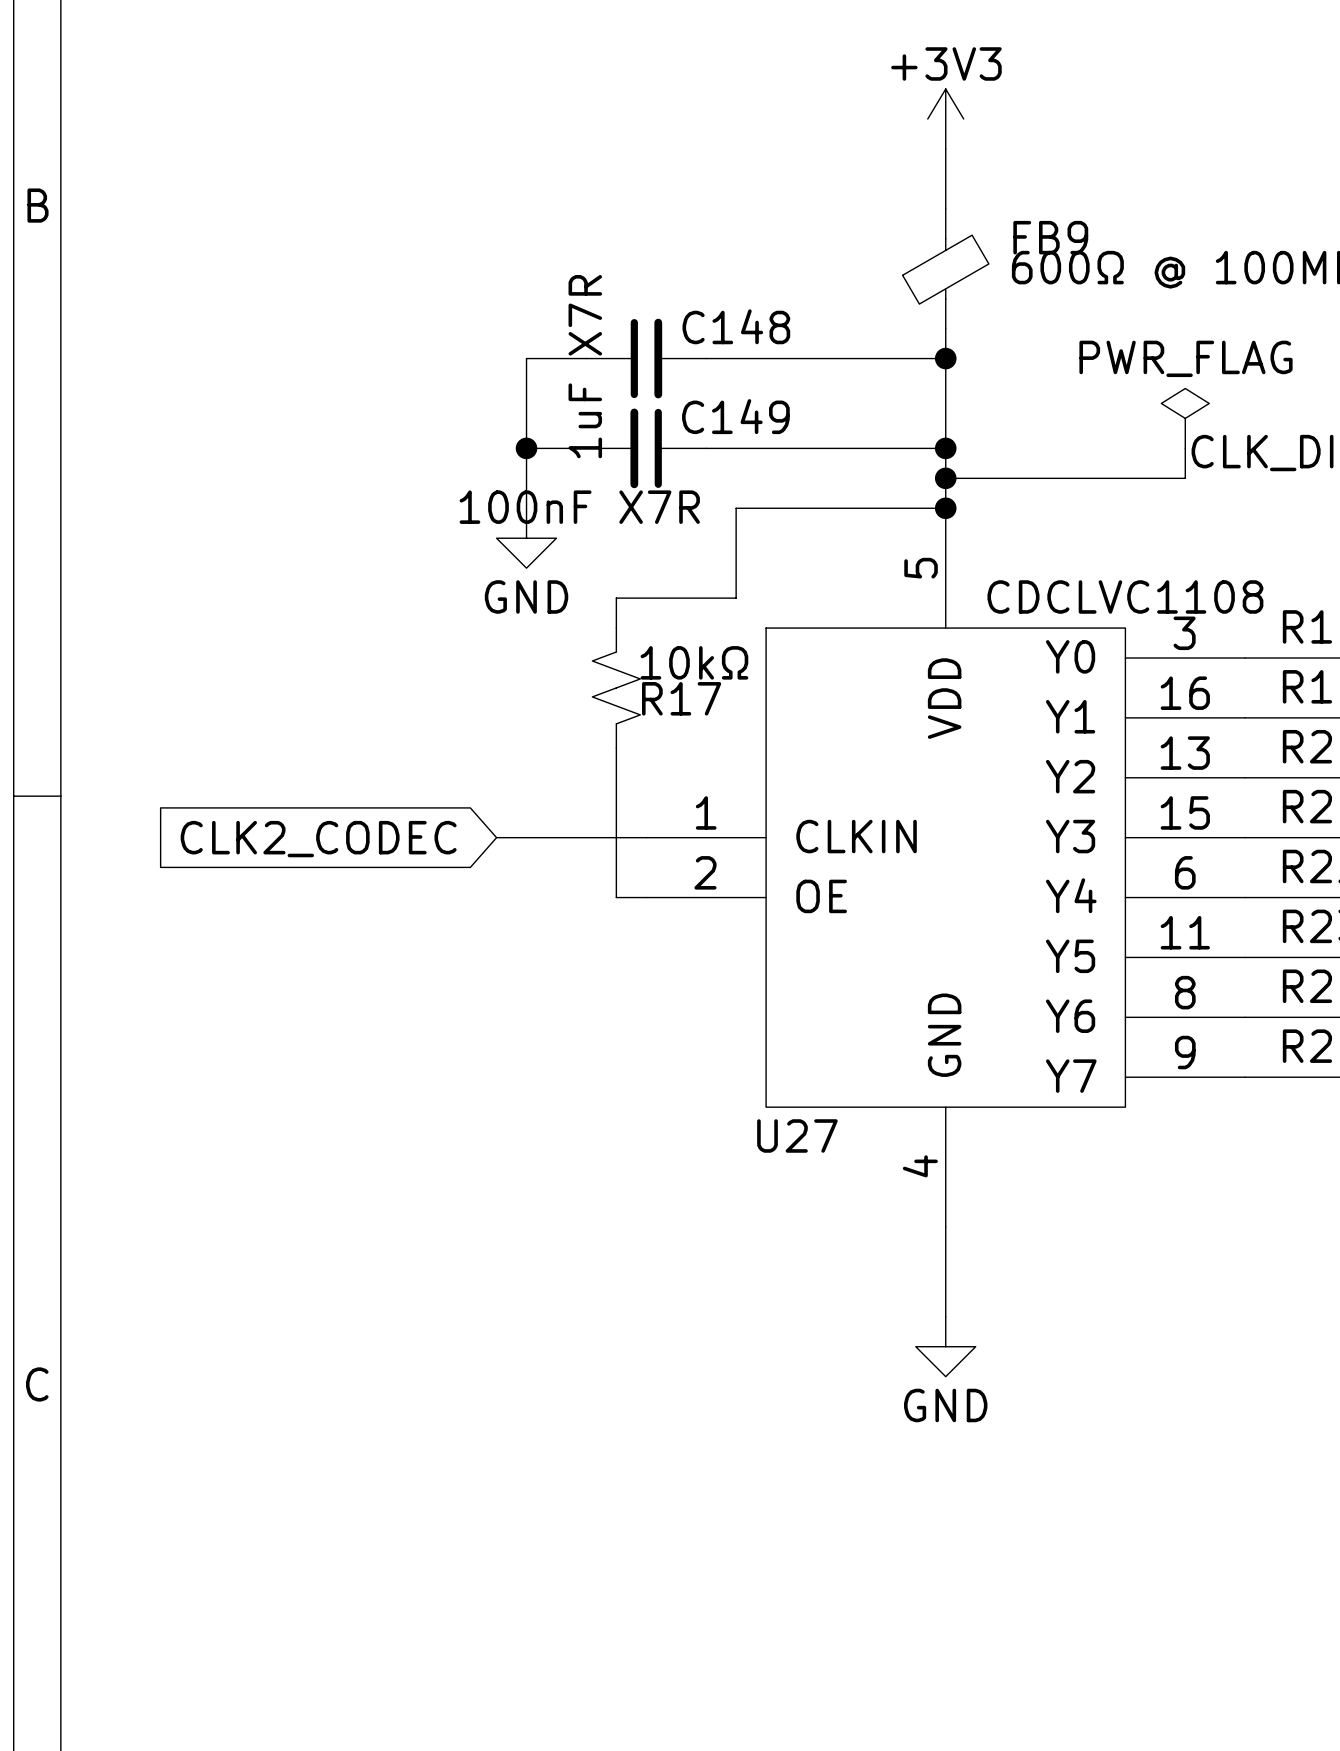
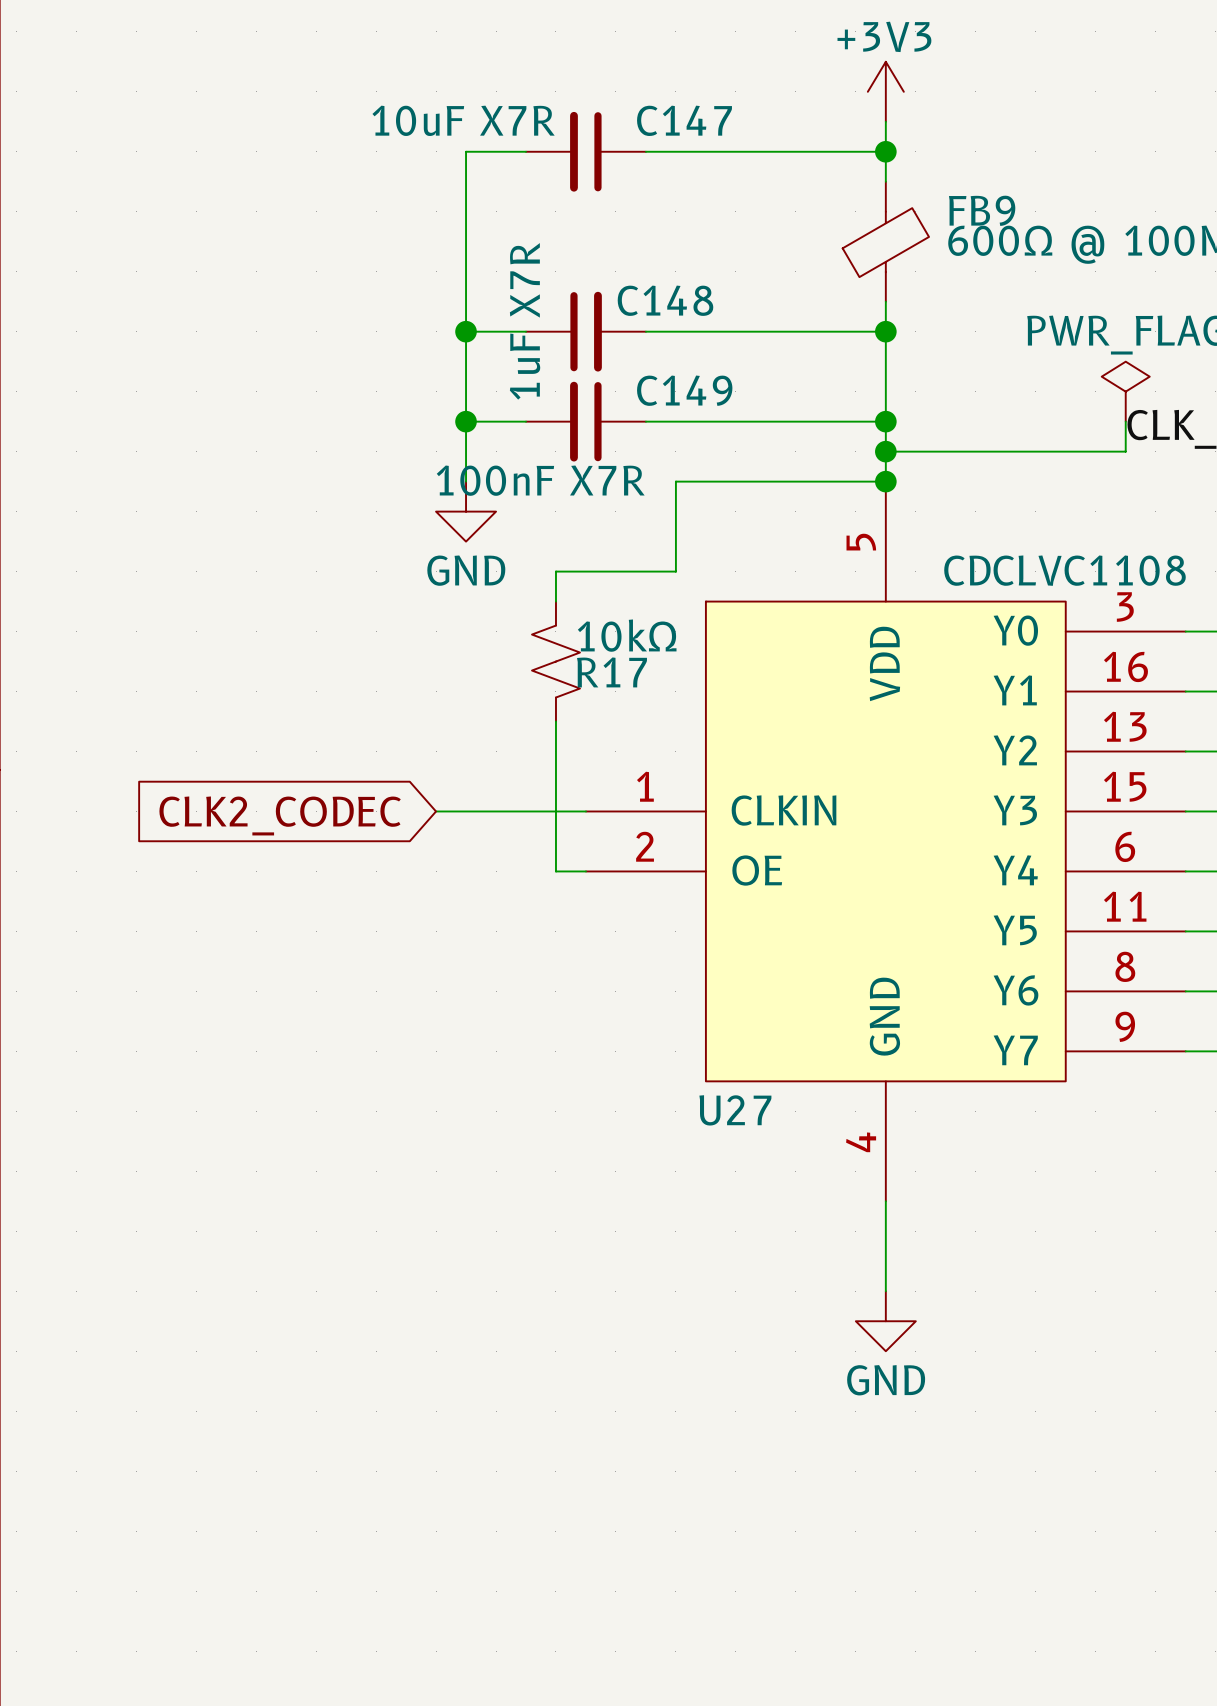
wire: none -> (526, 151) (466, 151) (466, 331)
C147: none -> 10uF X7R (585, 151)
wire: none -> (645, 151) (885, 151)
junction: none -> (885, 151)
junction: none -> (466, 331)

